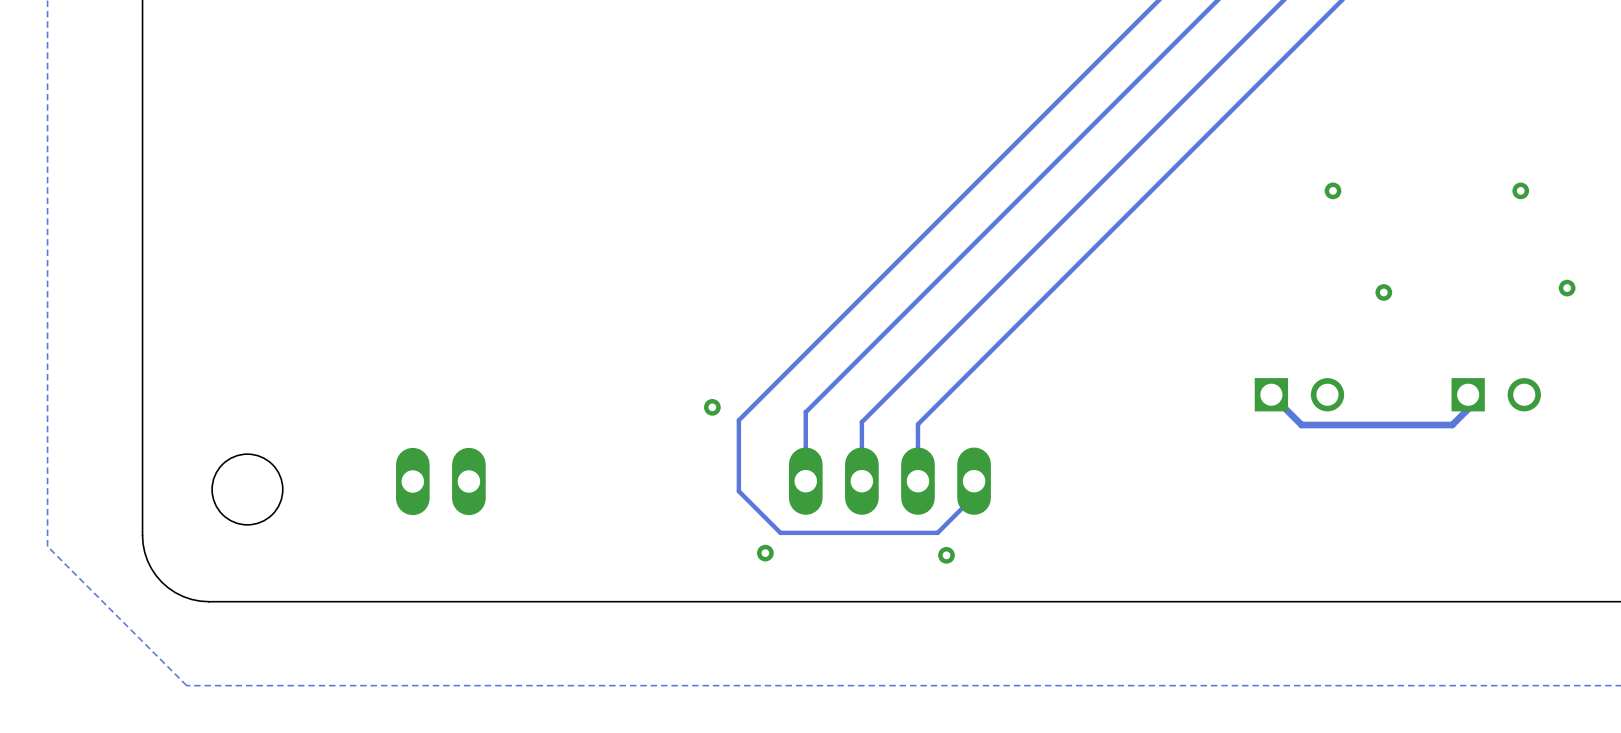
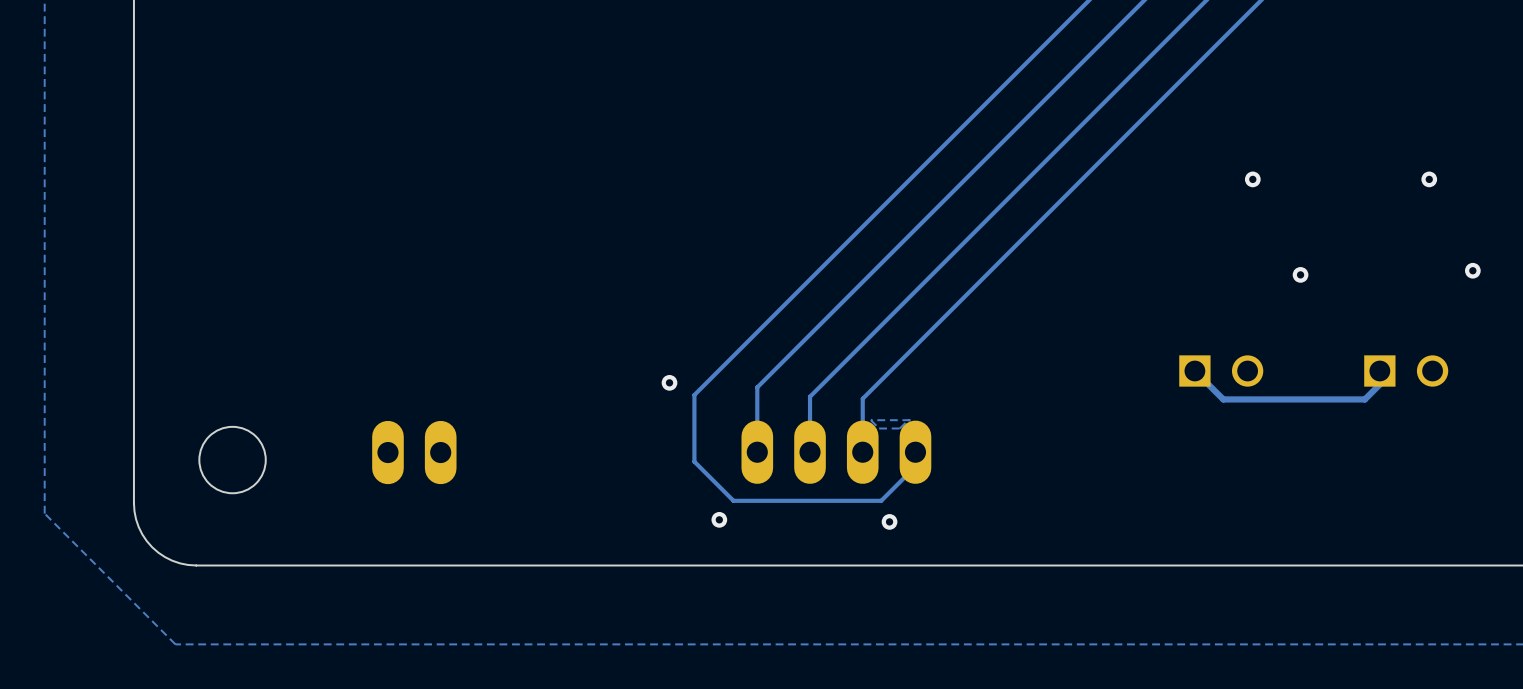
zone outline: none -> (910, 420) (870, 420) (879, 428) (899, 428) (908, 420)

